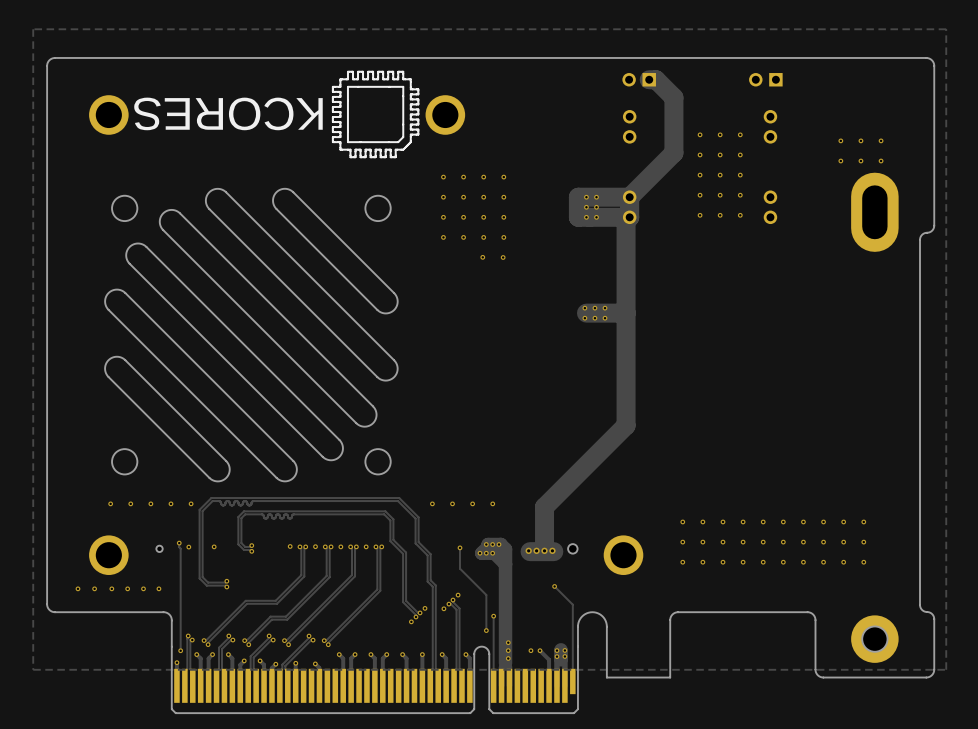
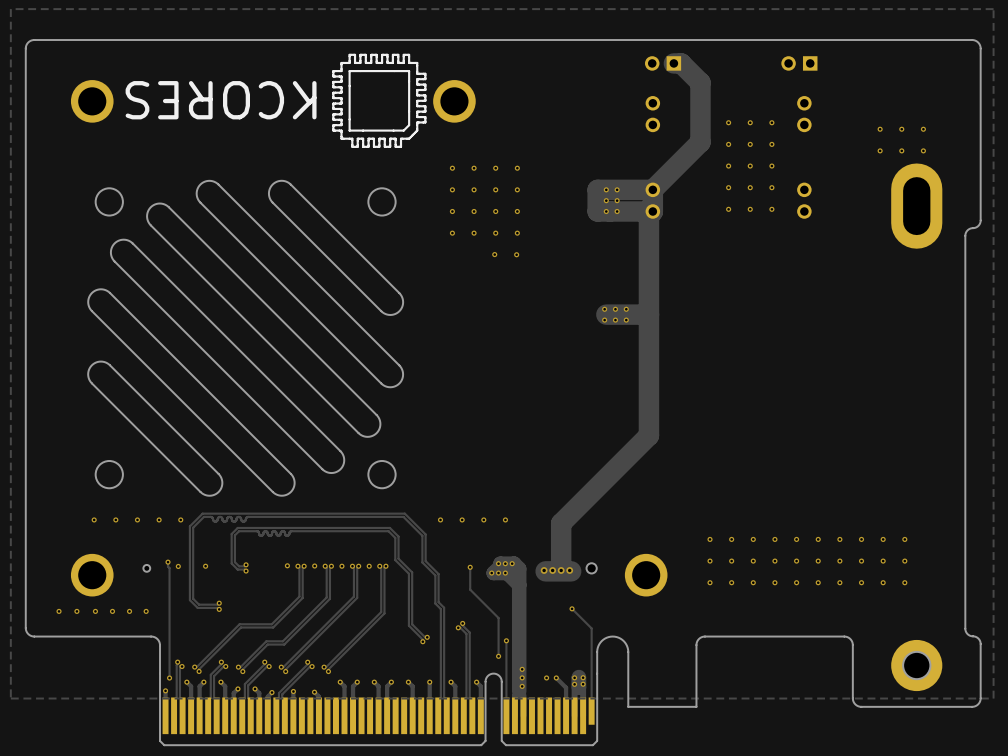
via: (458, 595) -> none
via: (425, 608) -> none
via: (443, 608) -> none
via: (411, 621) -> none

